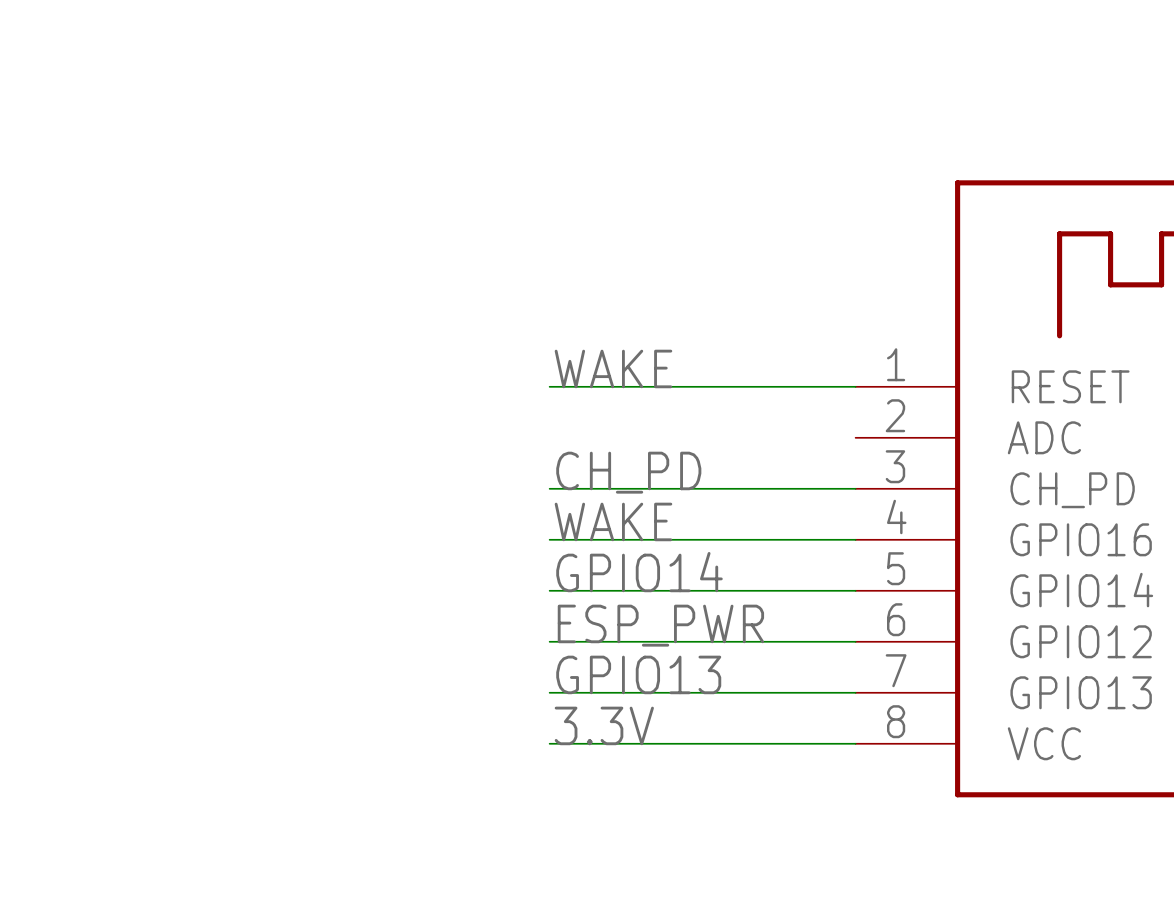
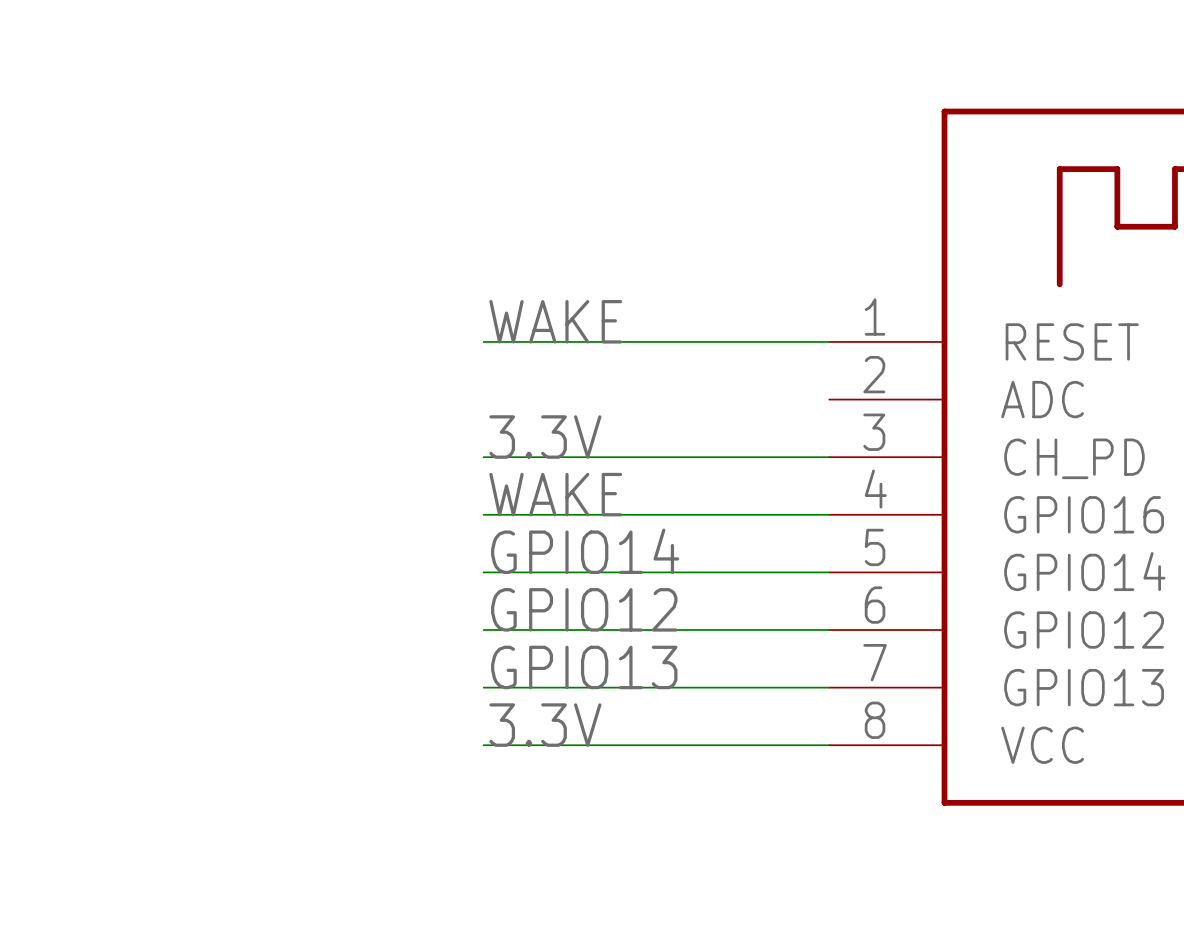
label: CH_PD (628, 472) -> 3.3V (545, 437)
label: ESP_PWR (660, 625) -> GPIO12 (584, 609)

